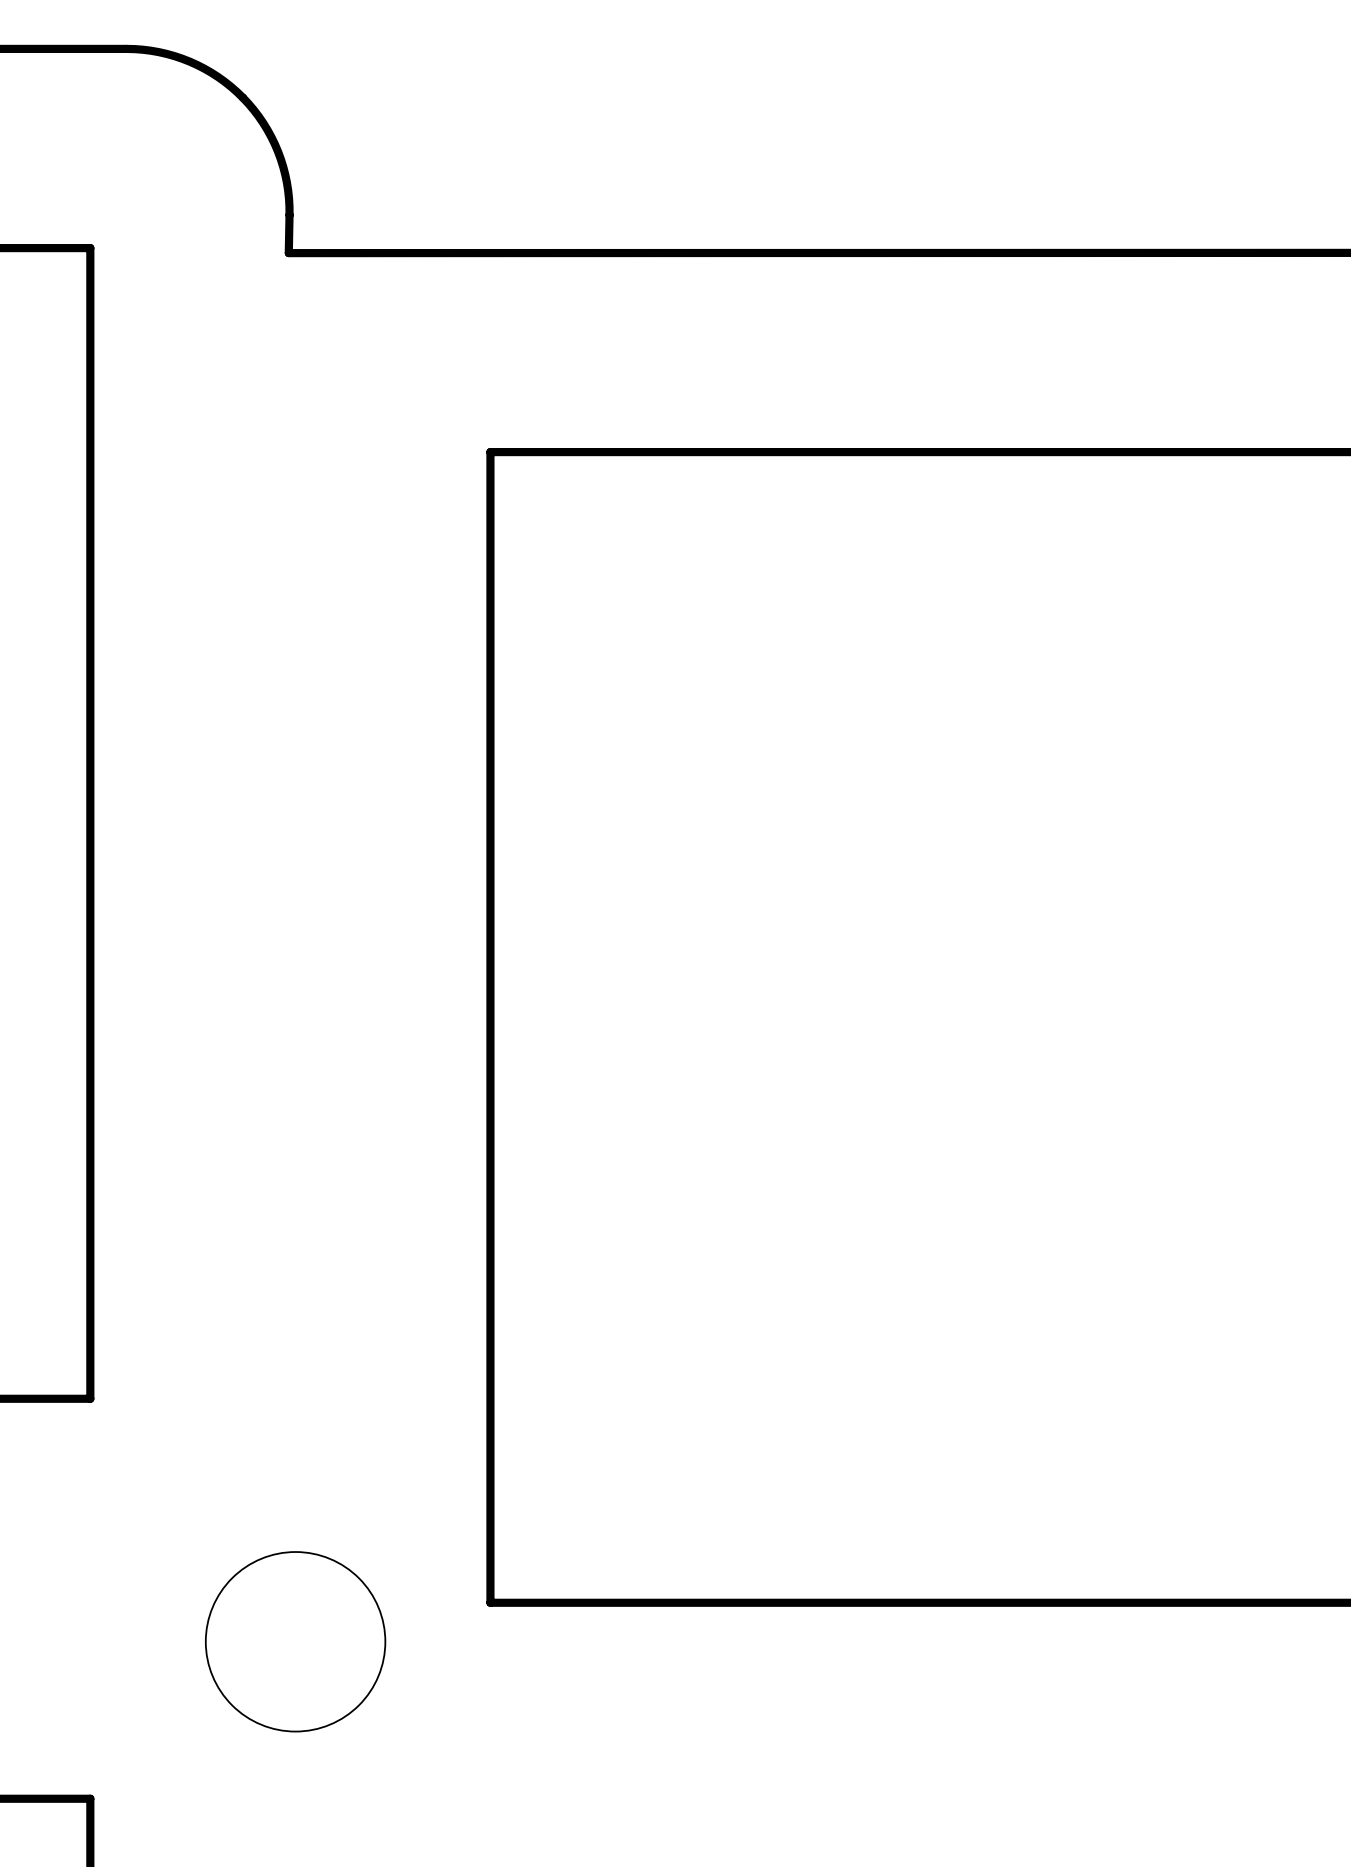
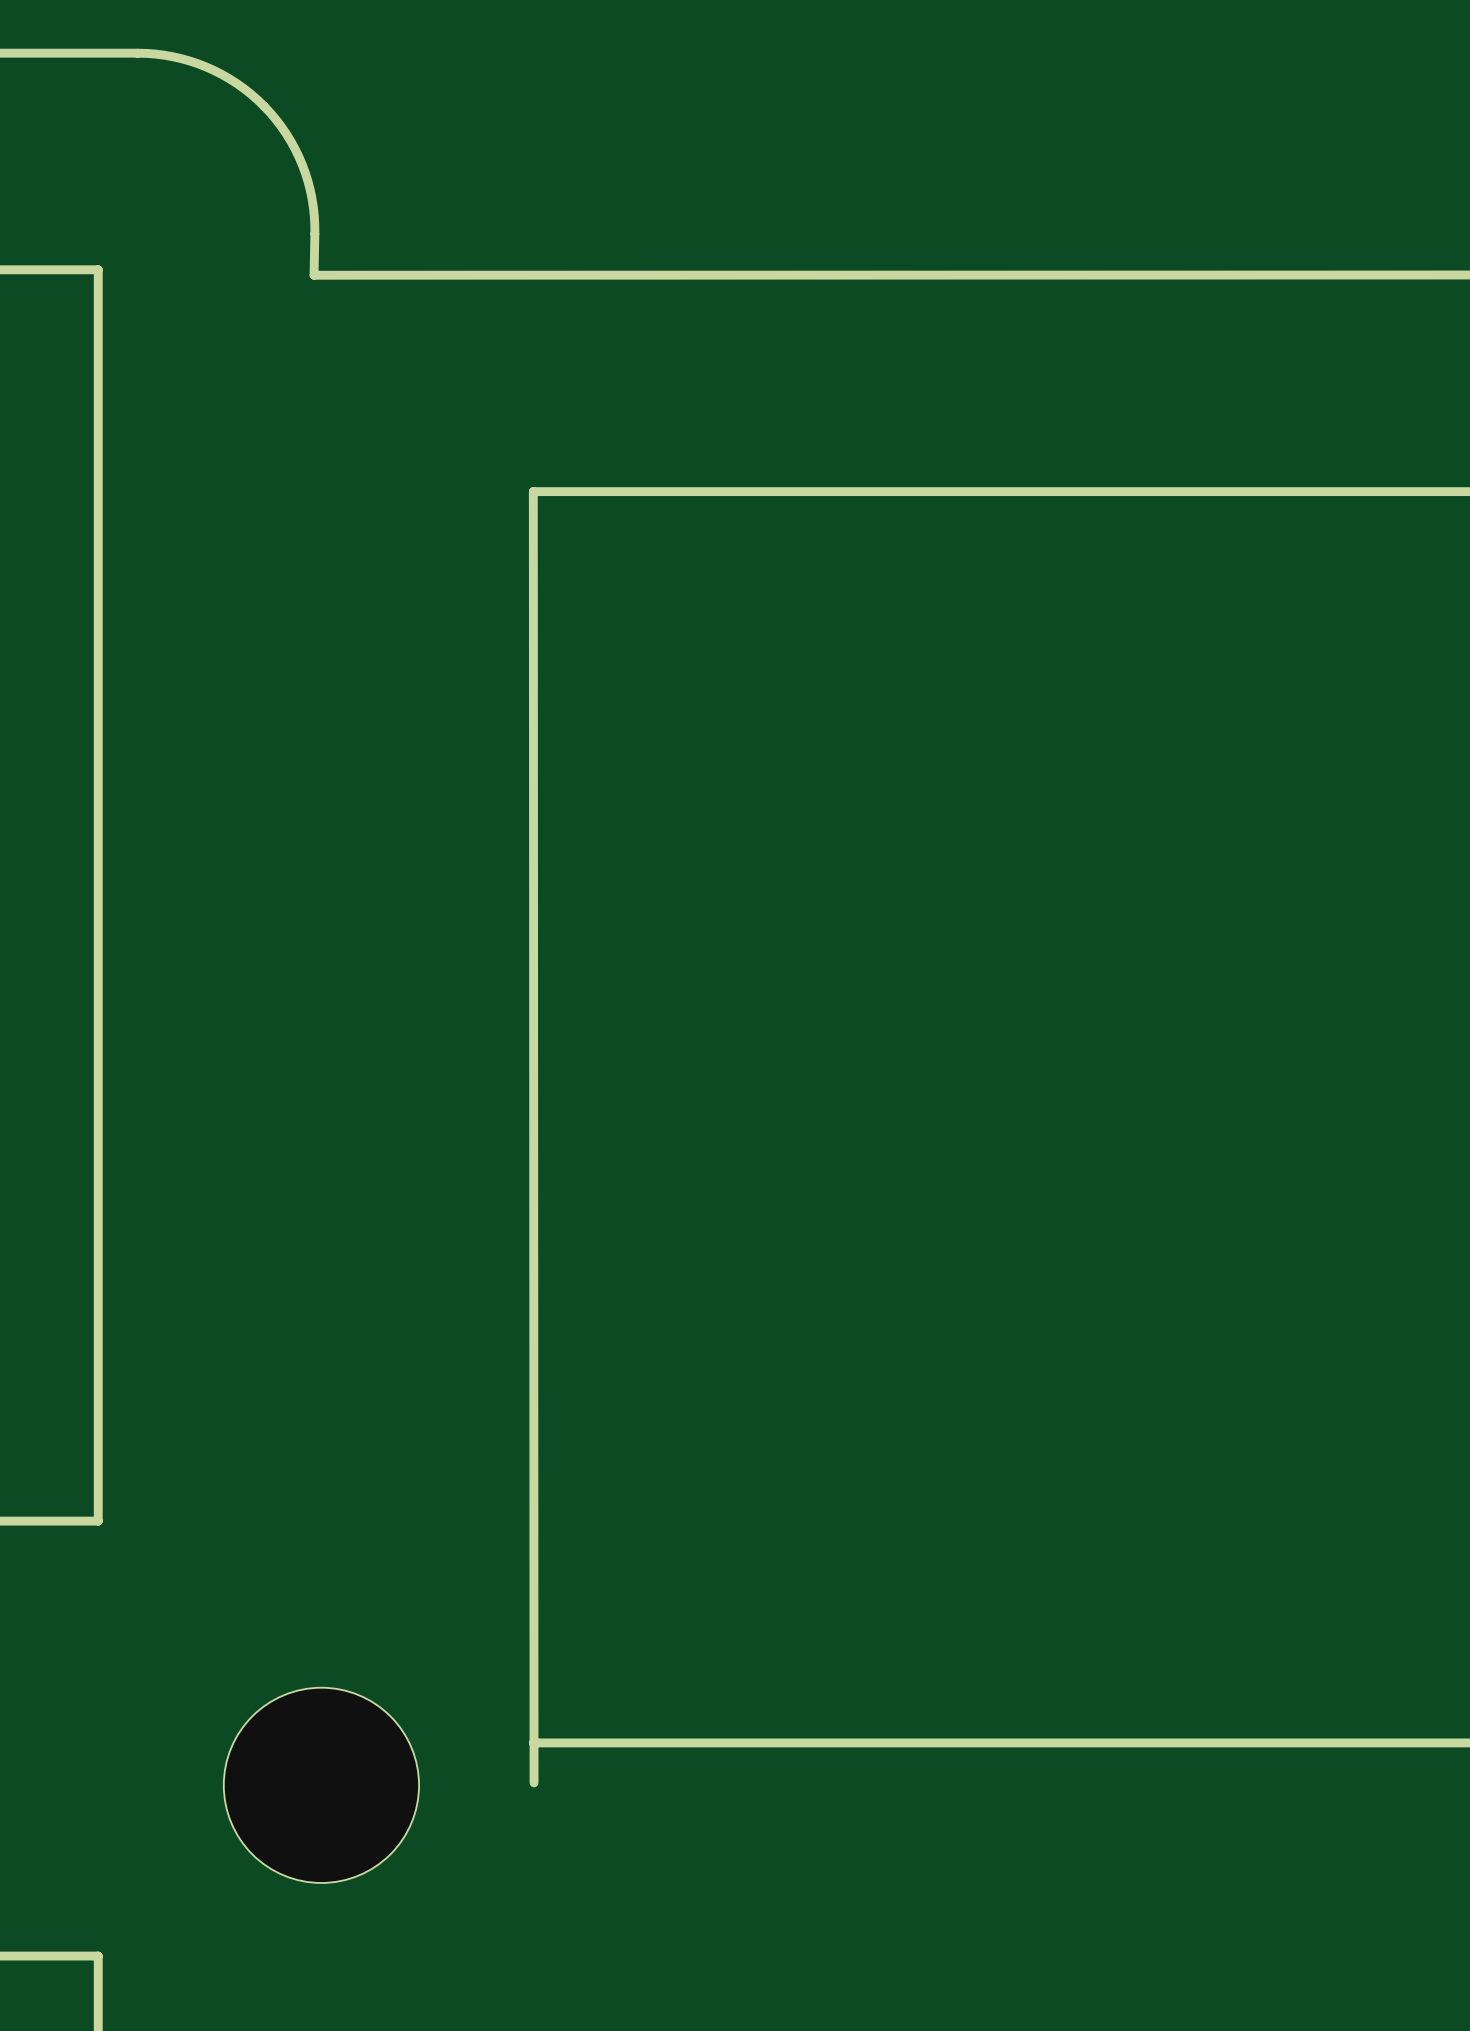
board edge: (490, 452) (490, 1602) -> (533, 491) (534, 1782)

